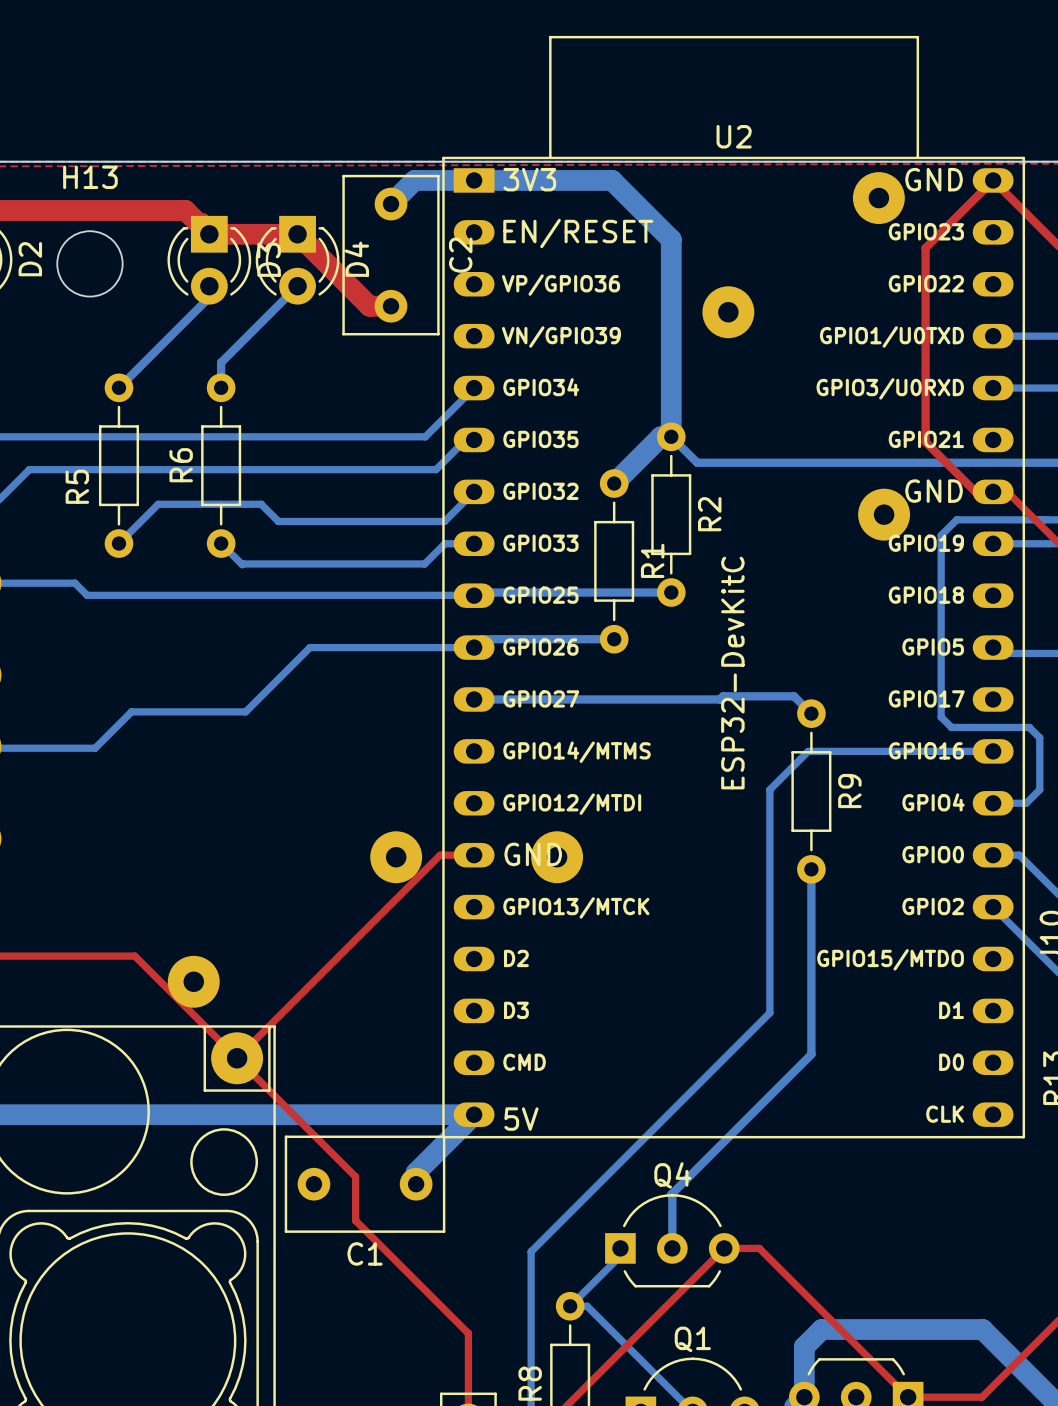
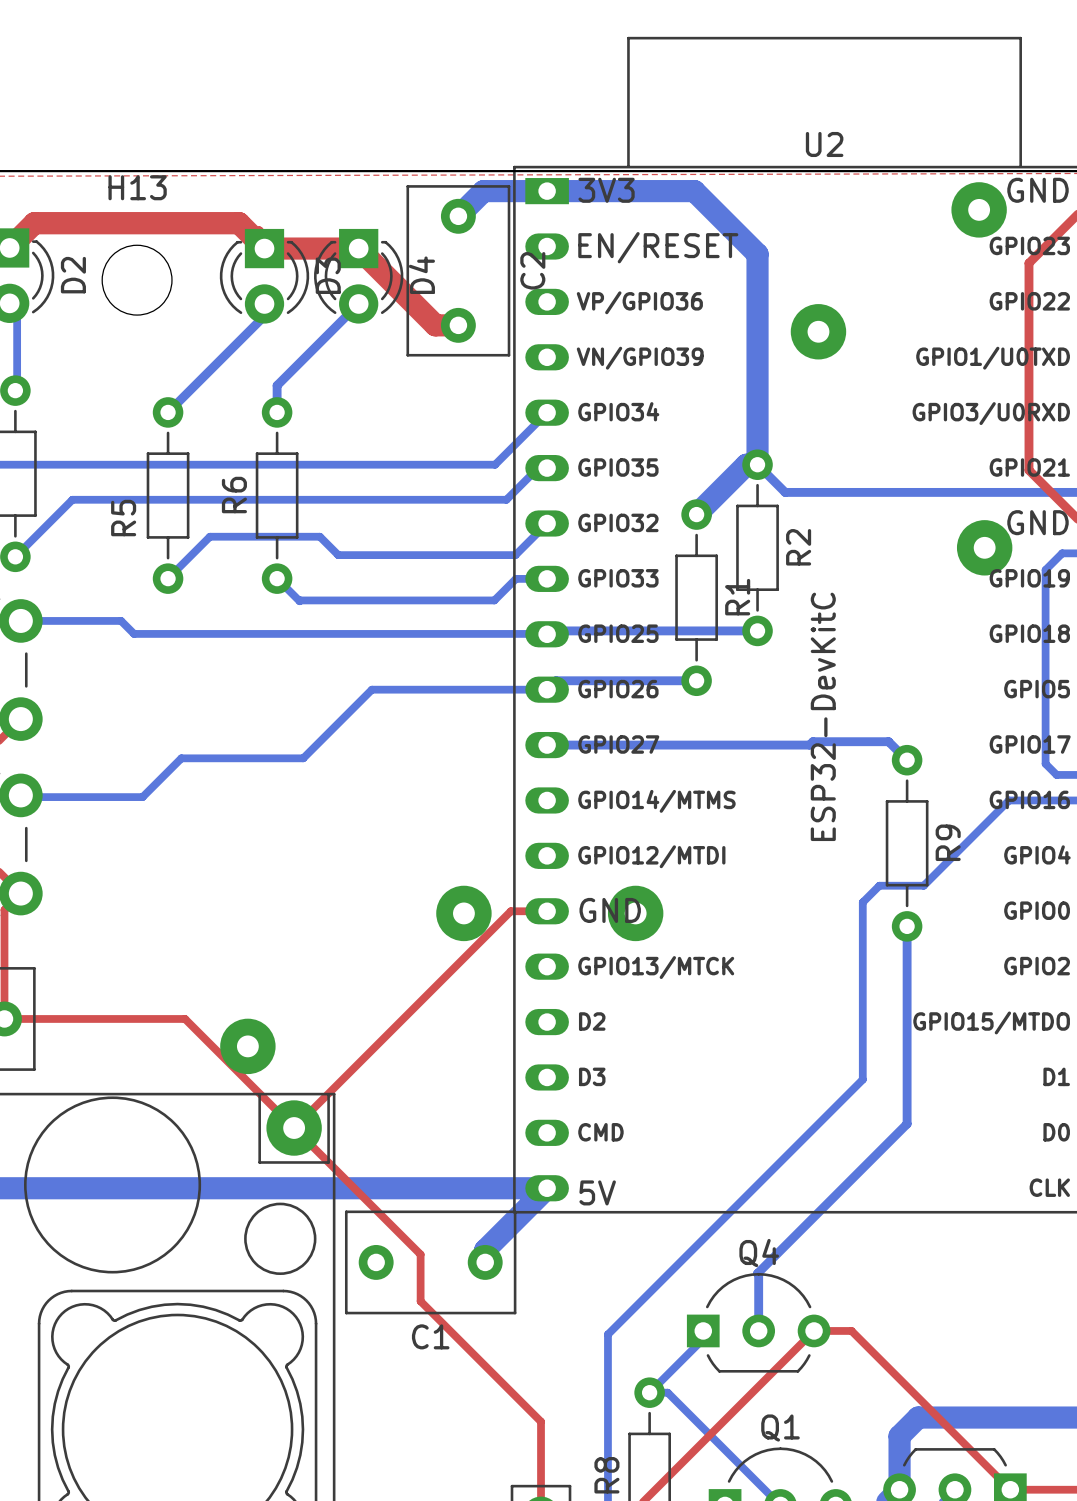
bottom track: (906, 751) (808, 751) (769, 789) (769, 846) -> (1008, 800) (923, 885) (879, 885) (862, 902)

